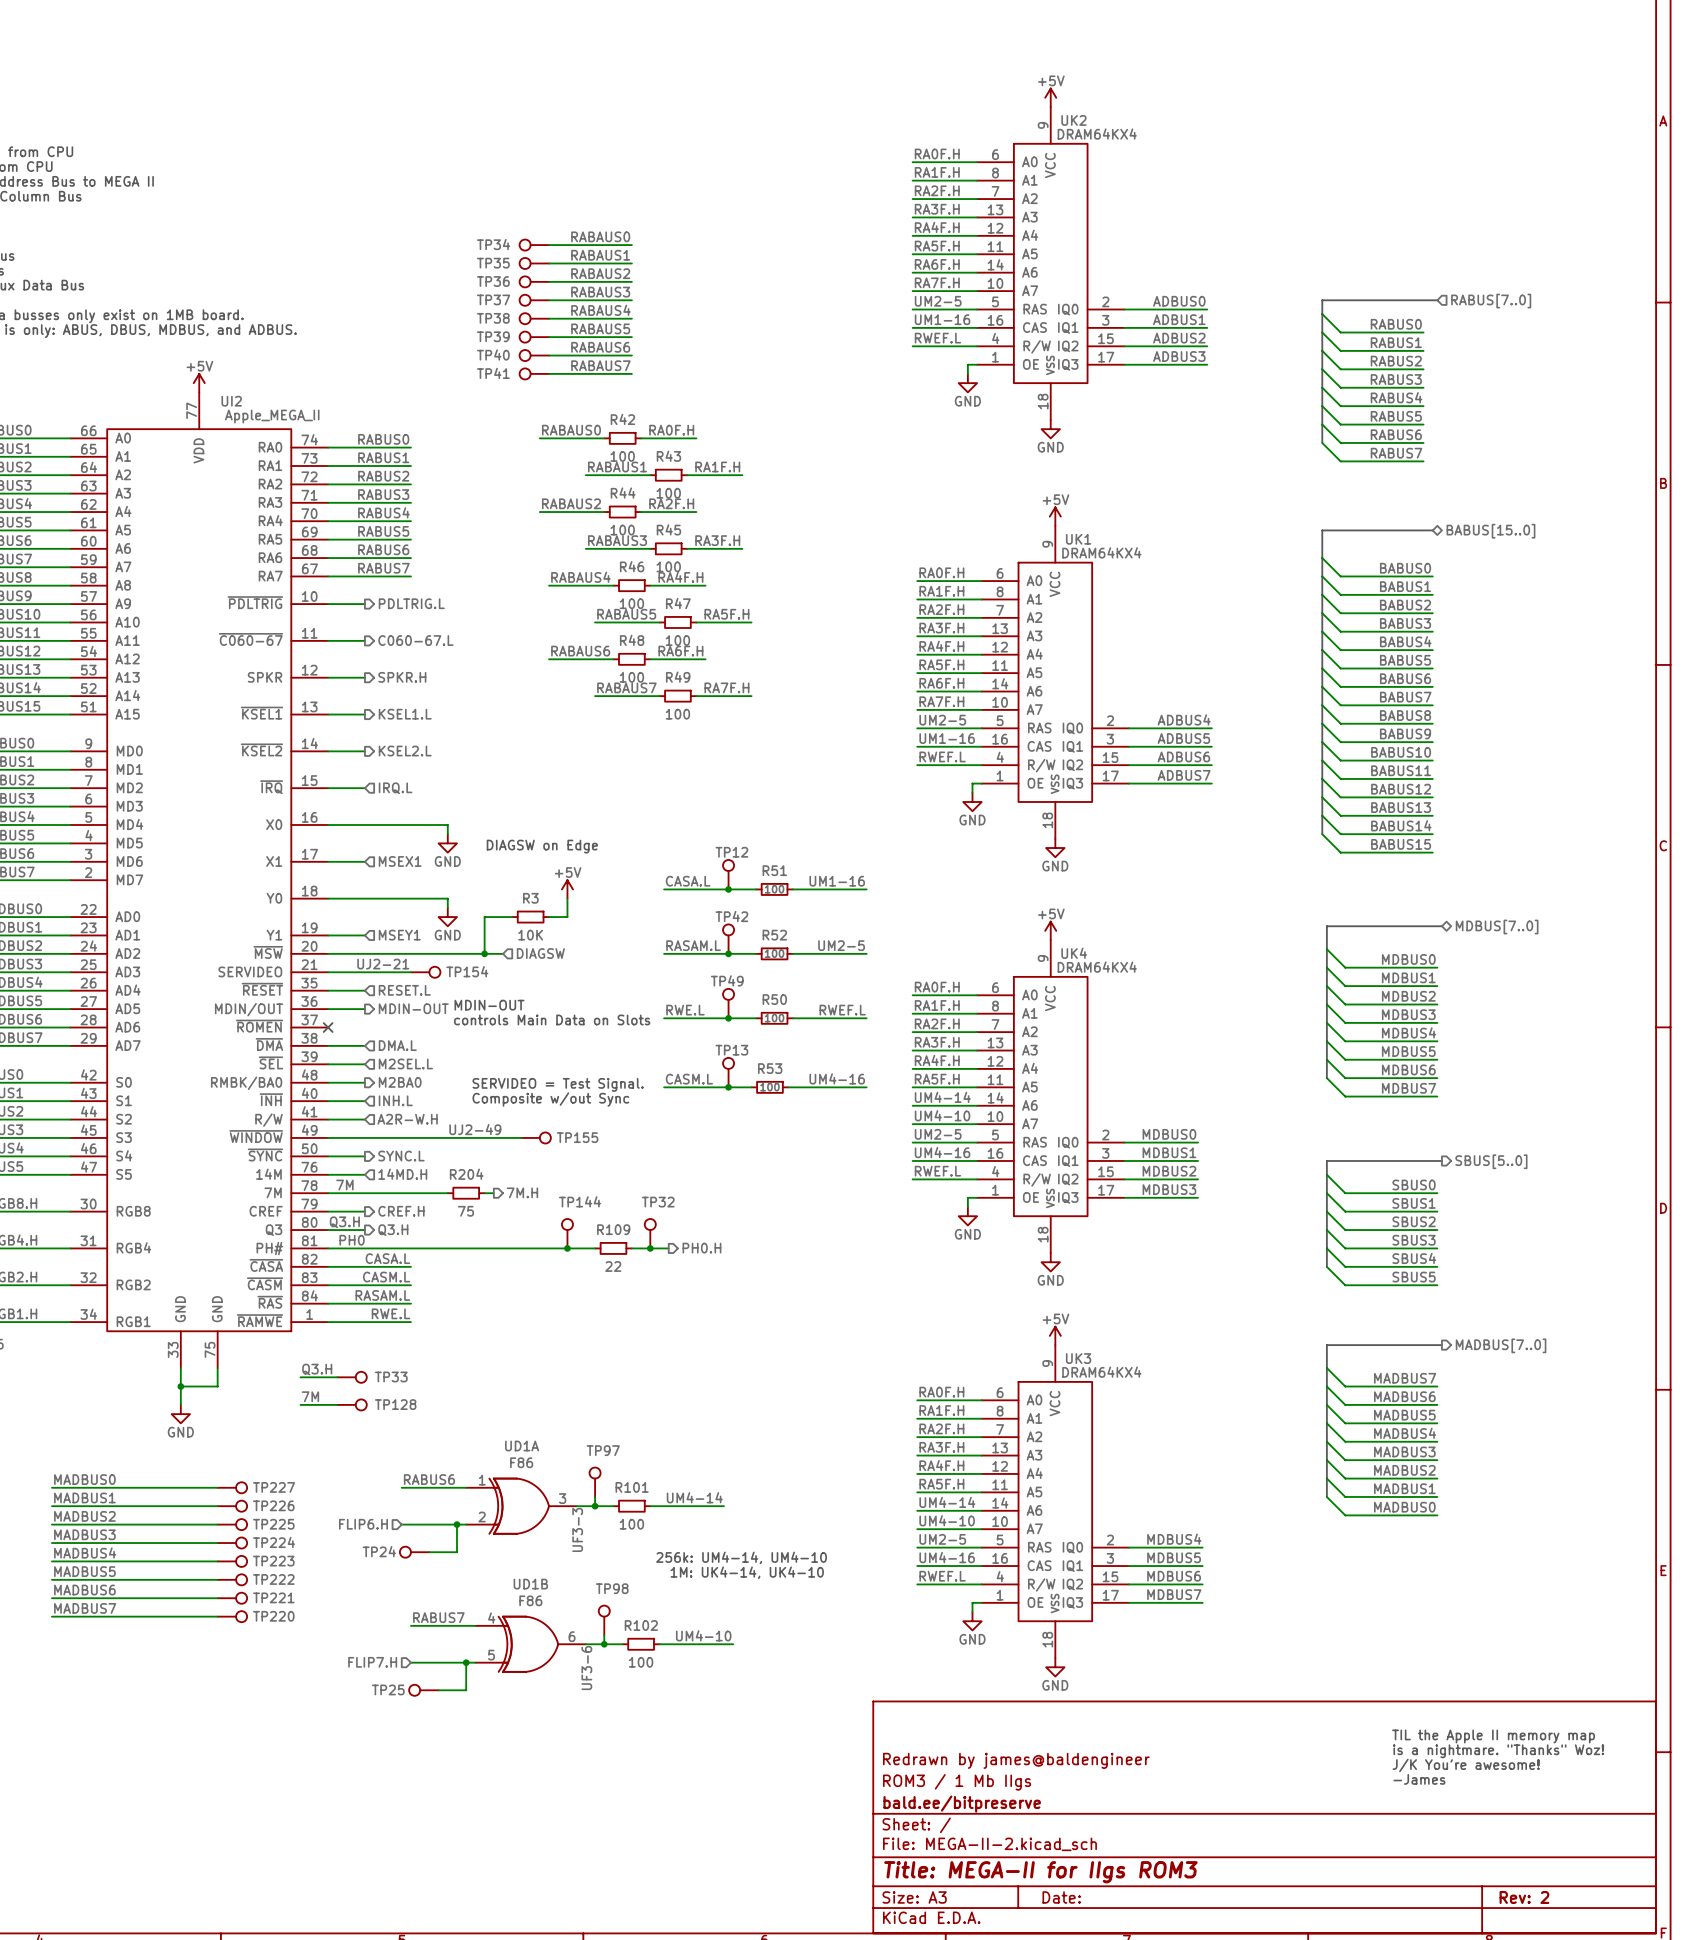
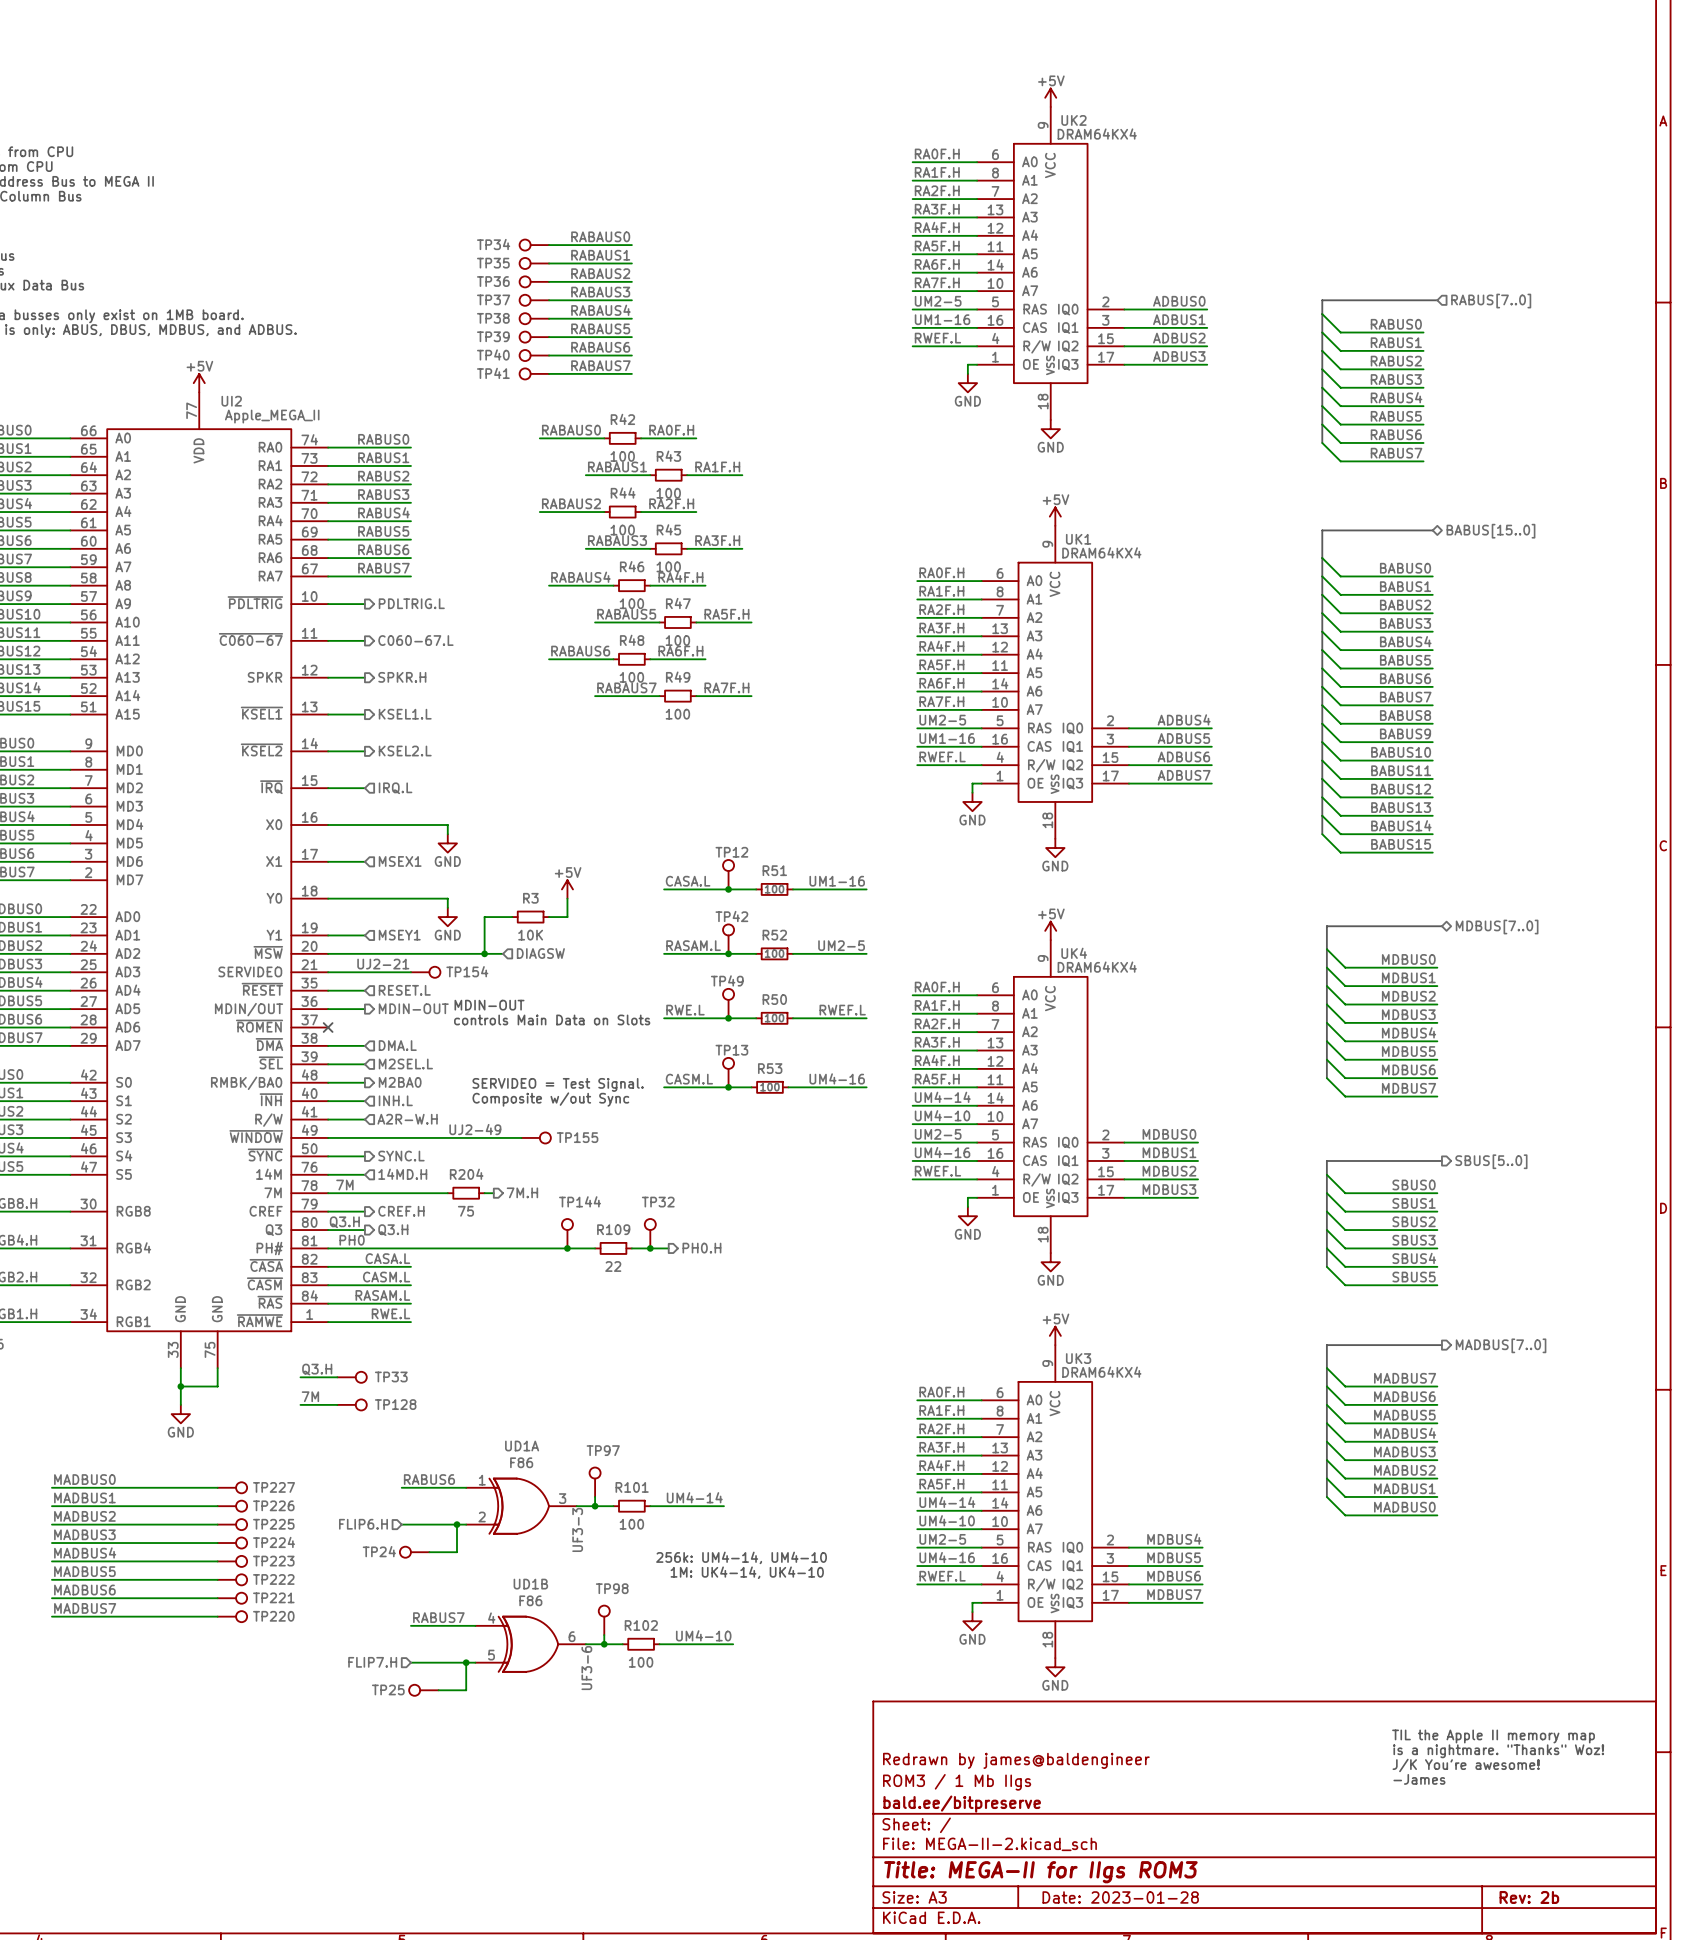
text: DIAGSW on Edge (542, 846) -> none
title block: Date: (1061, 1897) -> Date: 2023-01-28 (1120, 1897)
title block: Rev: 2 (1524, 1897) -> Rev: 2b (1529, 1897)

